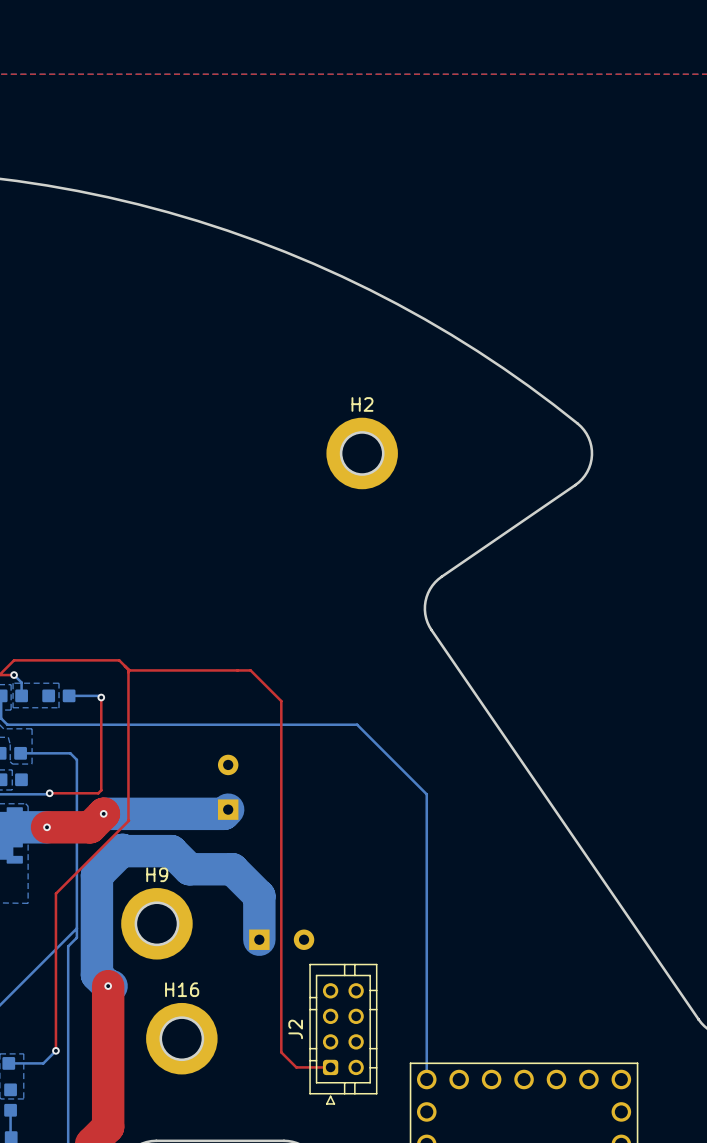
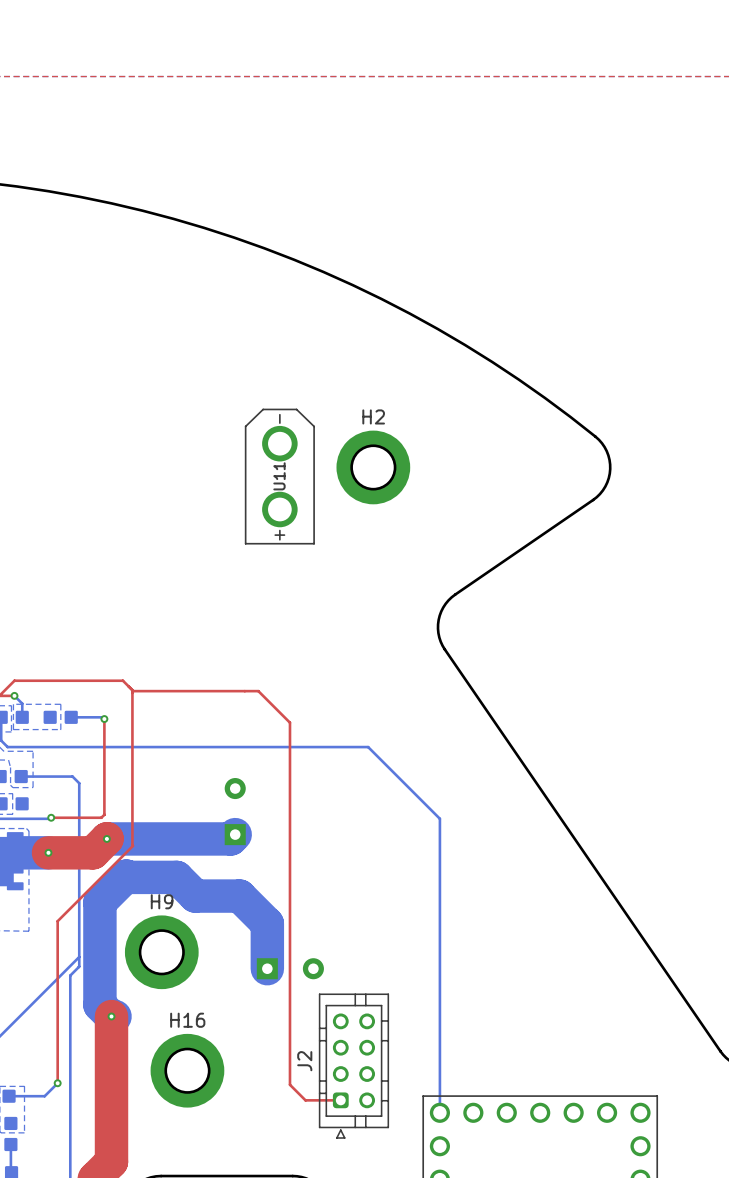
U11: none -> (279, 476)

